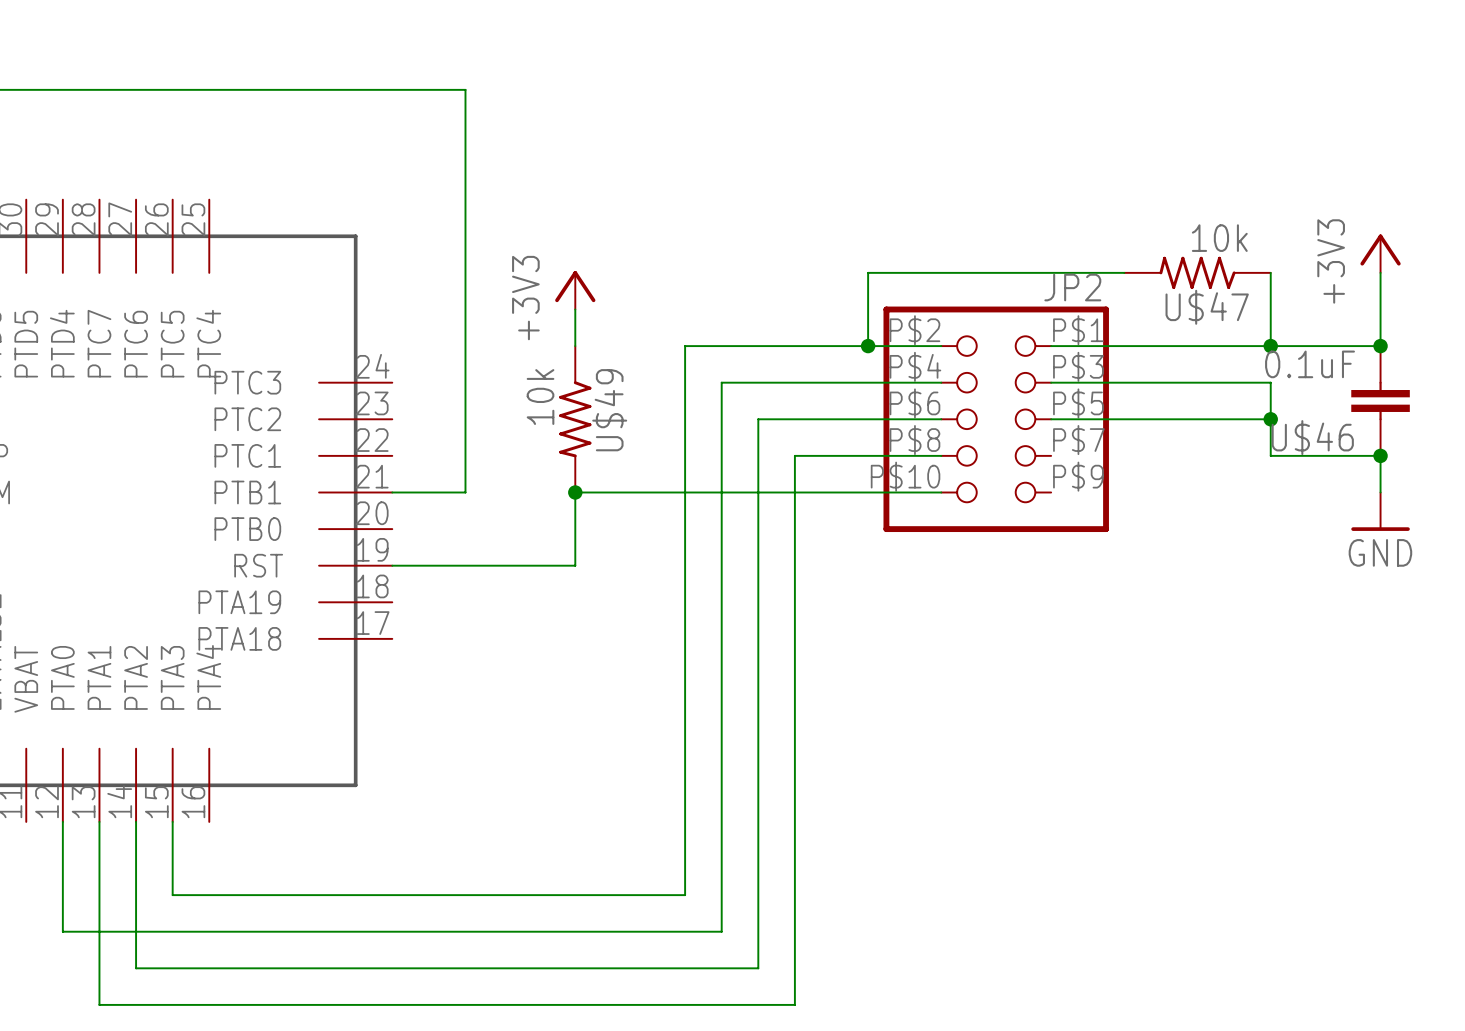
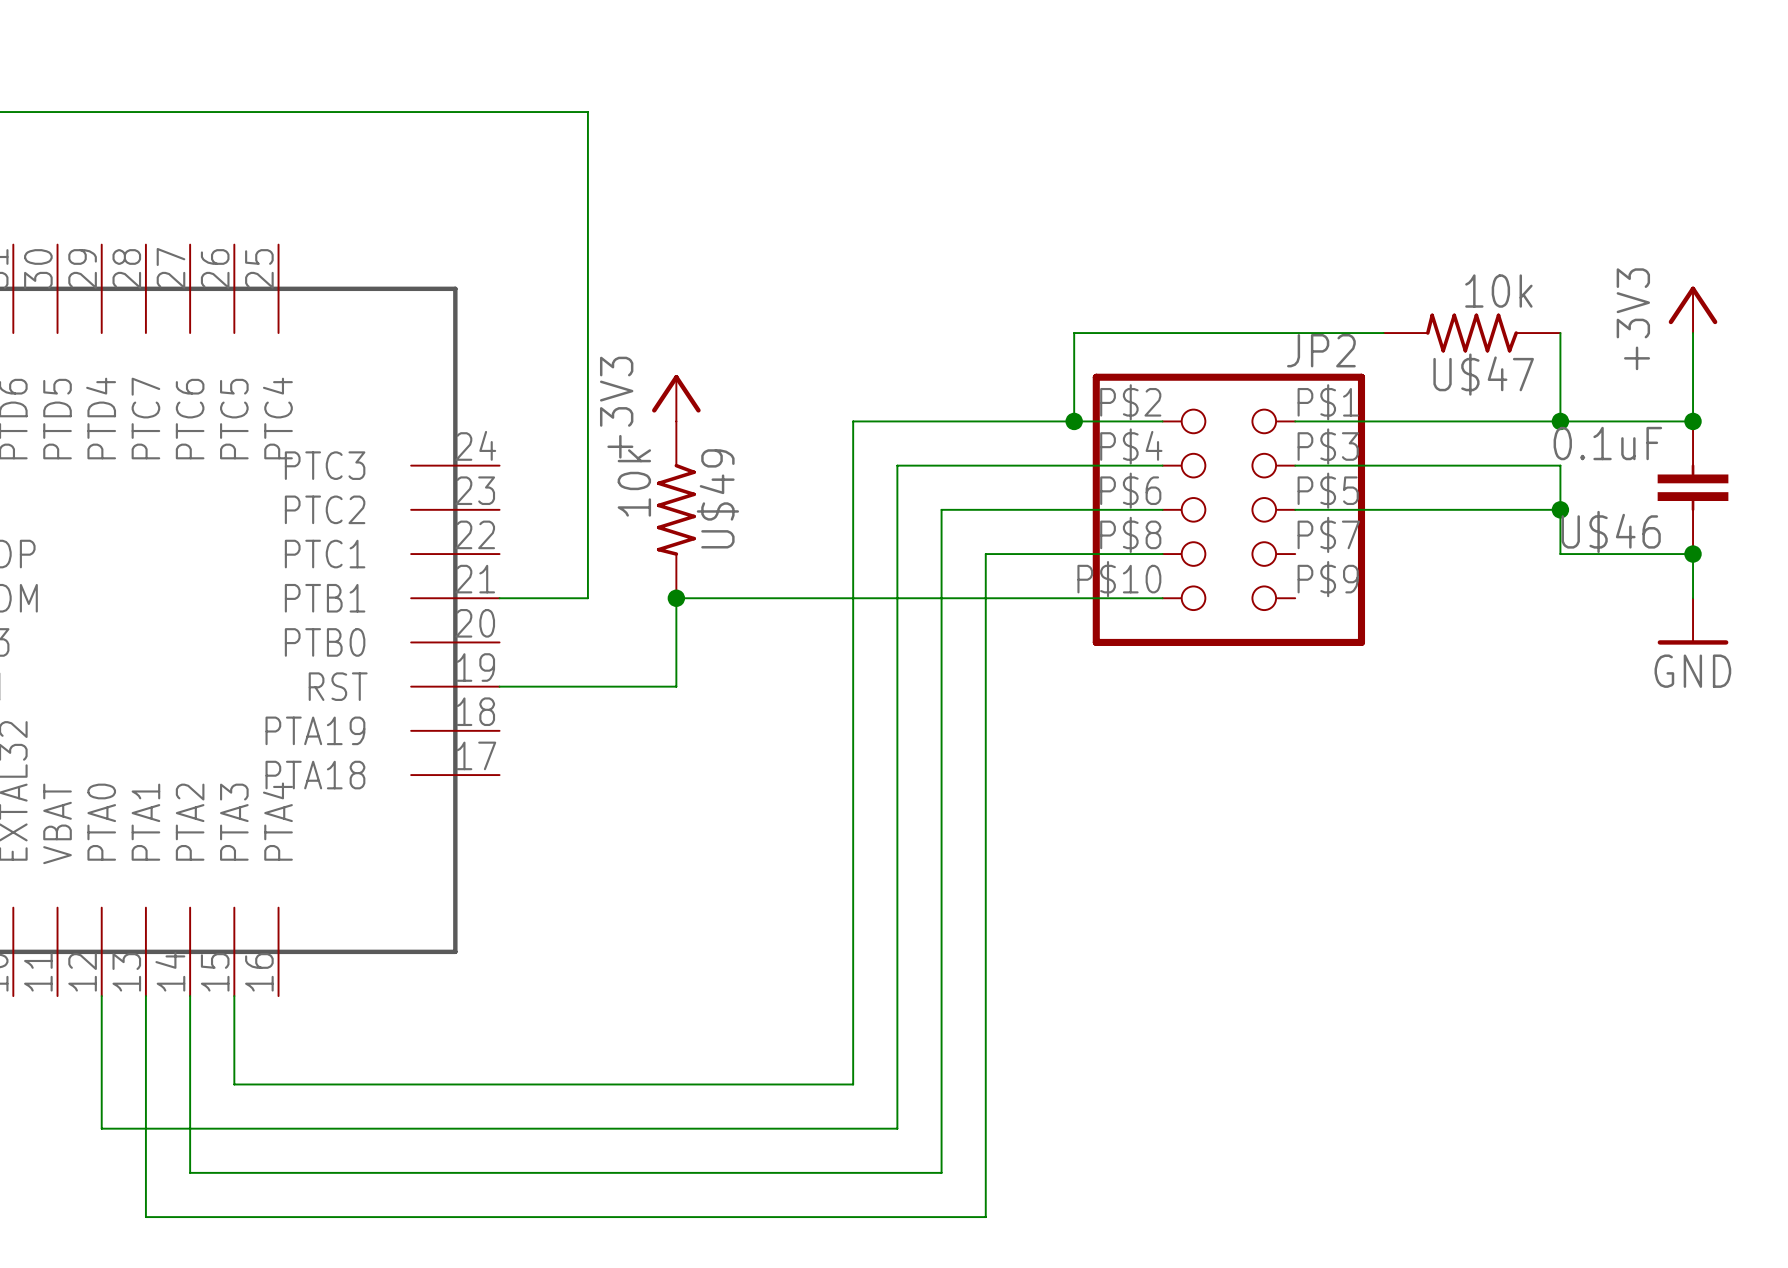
power symbol position: +3V3 (575, 290) -> +3V3 (676, 398)
wire: (575, 309) (575, 346) -> none
U$49 position: (575, 419) -> (676, 509)
wire: (575, 492) (575, 565) (538, 565) -> (720, 598) (676, 598) (676, 686)
junction position: (575, 492) -> (676, 598)

